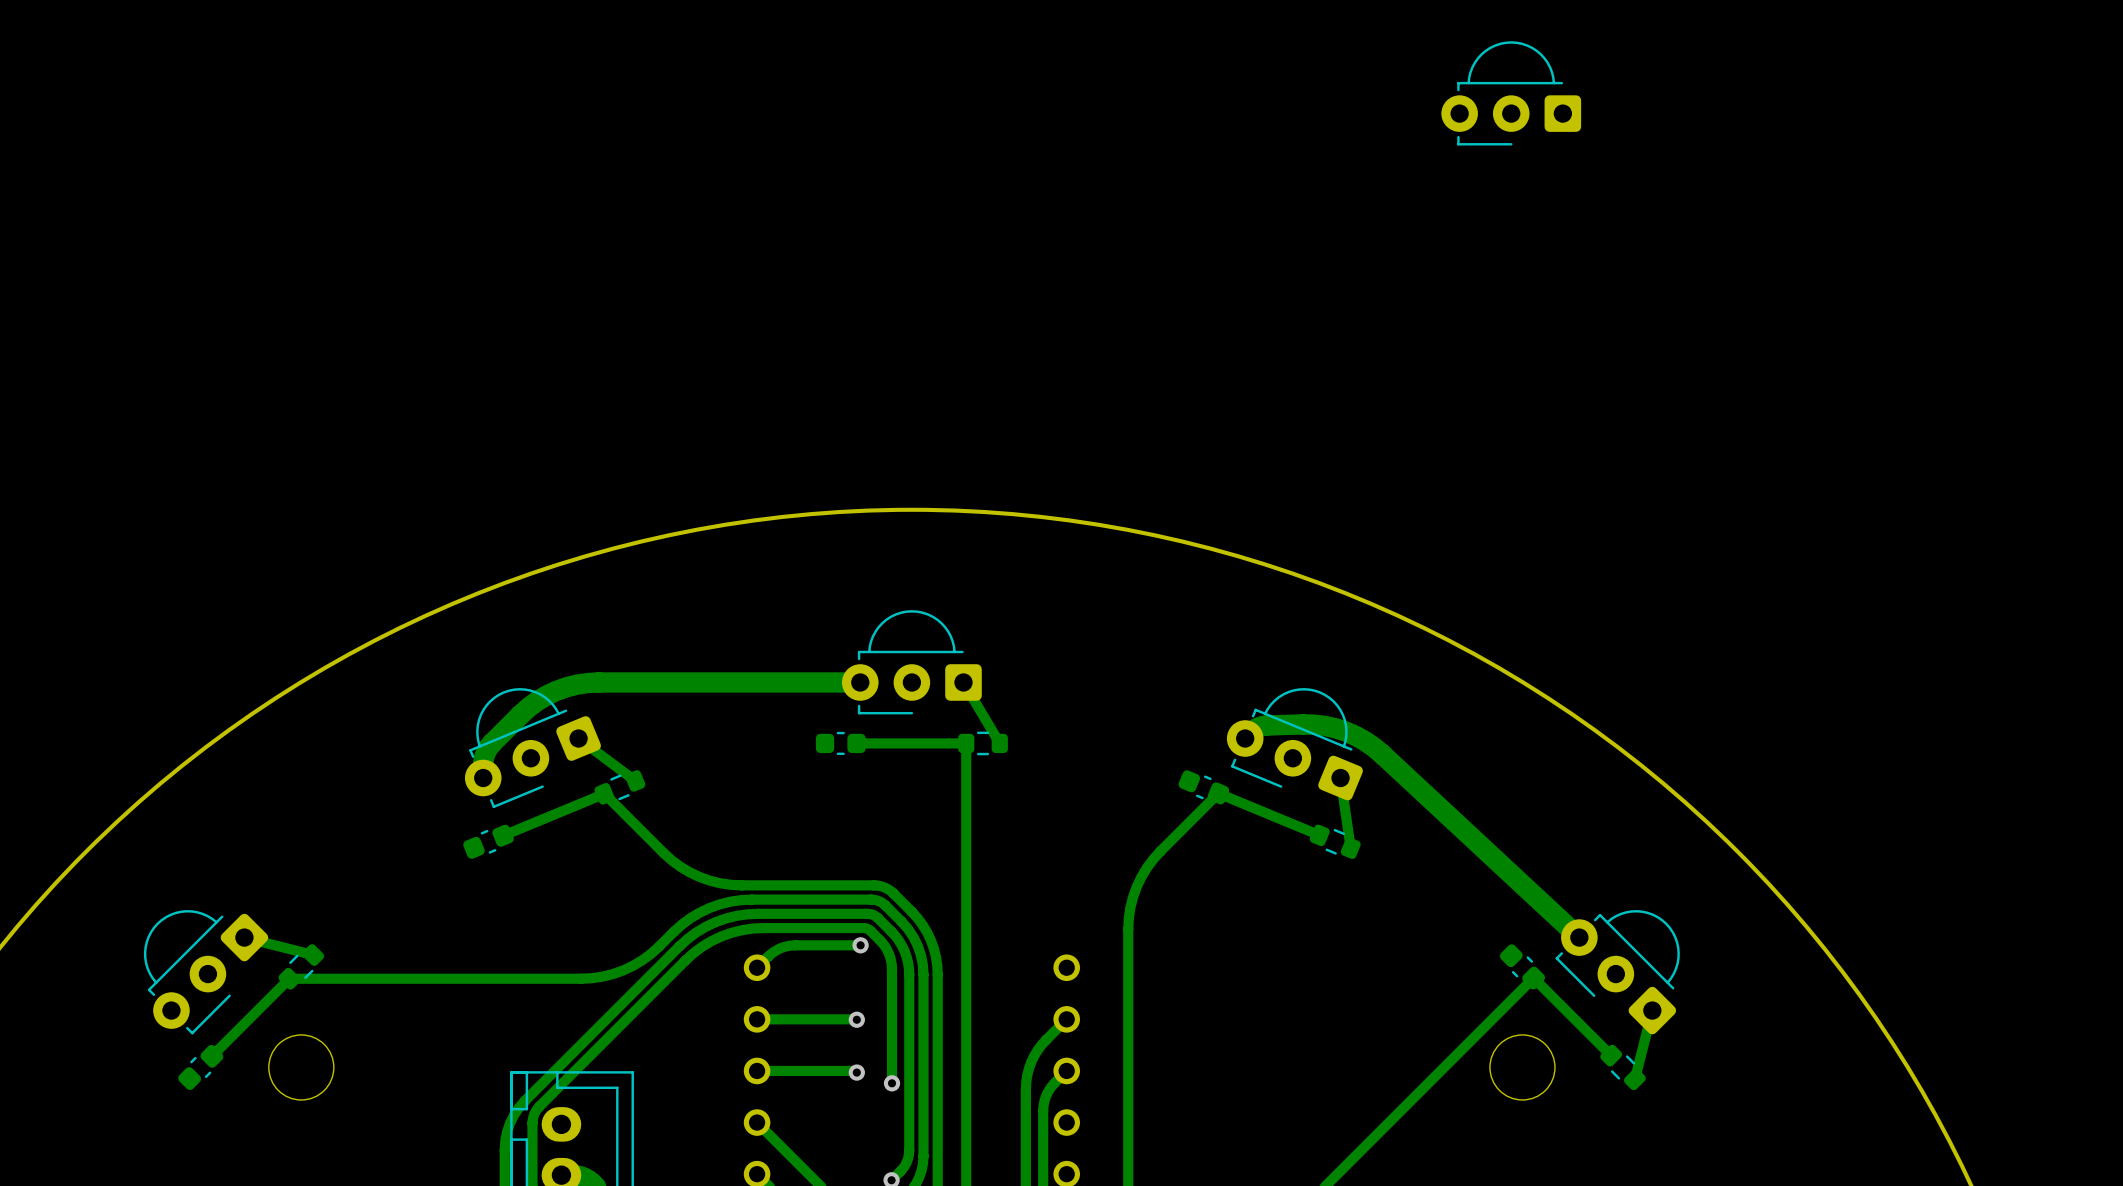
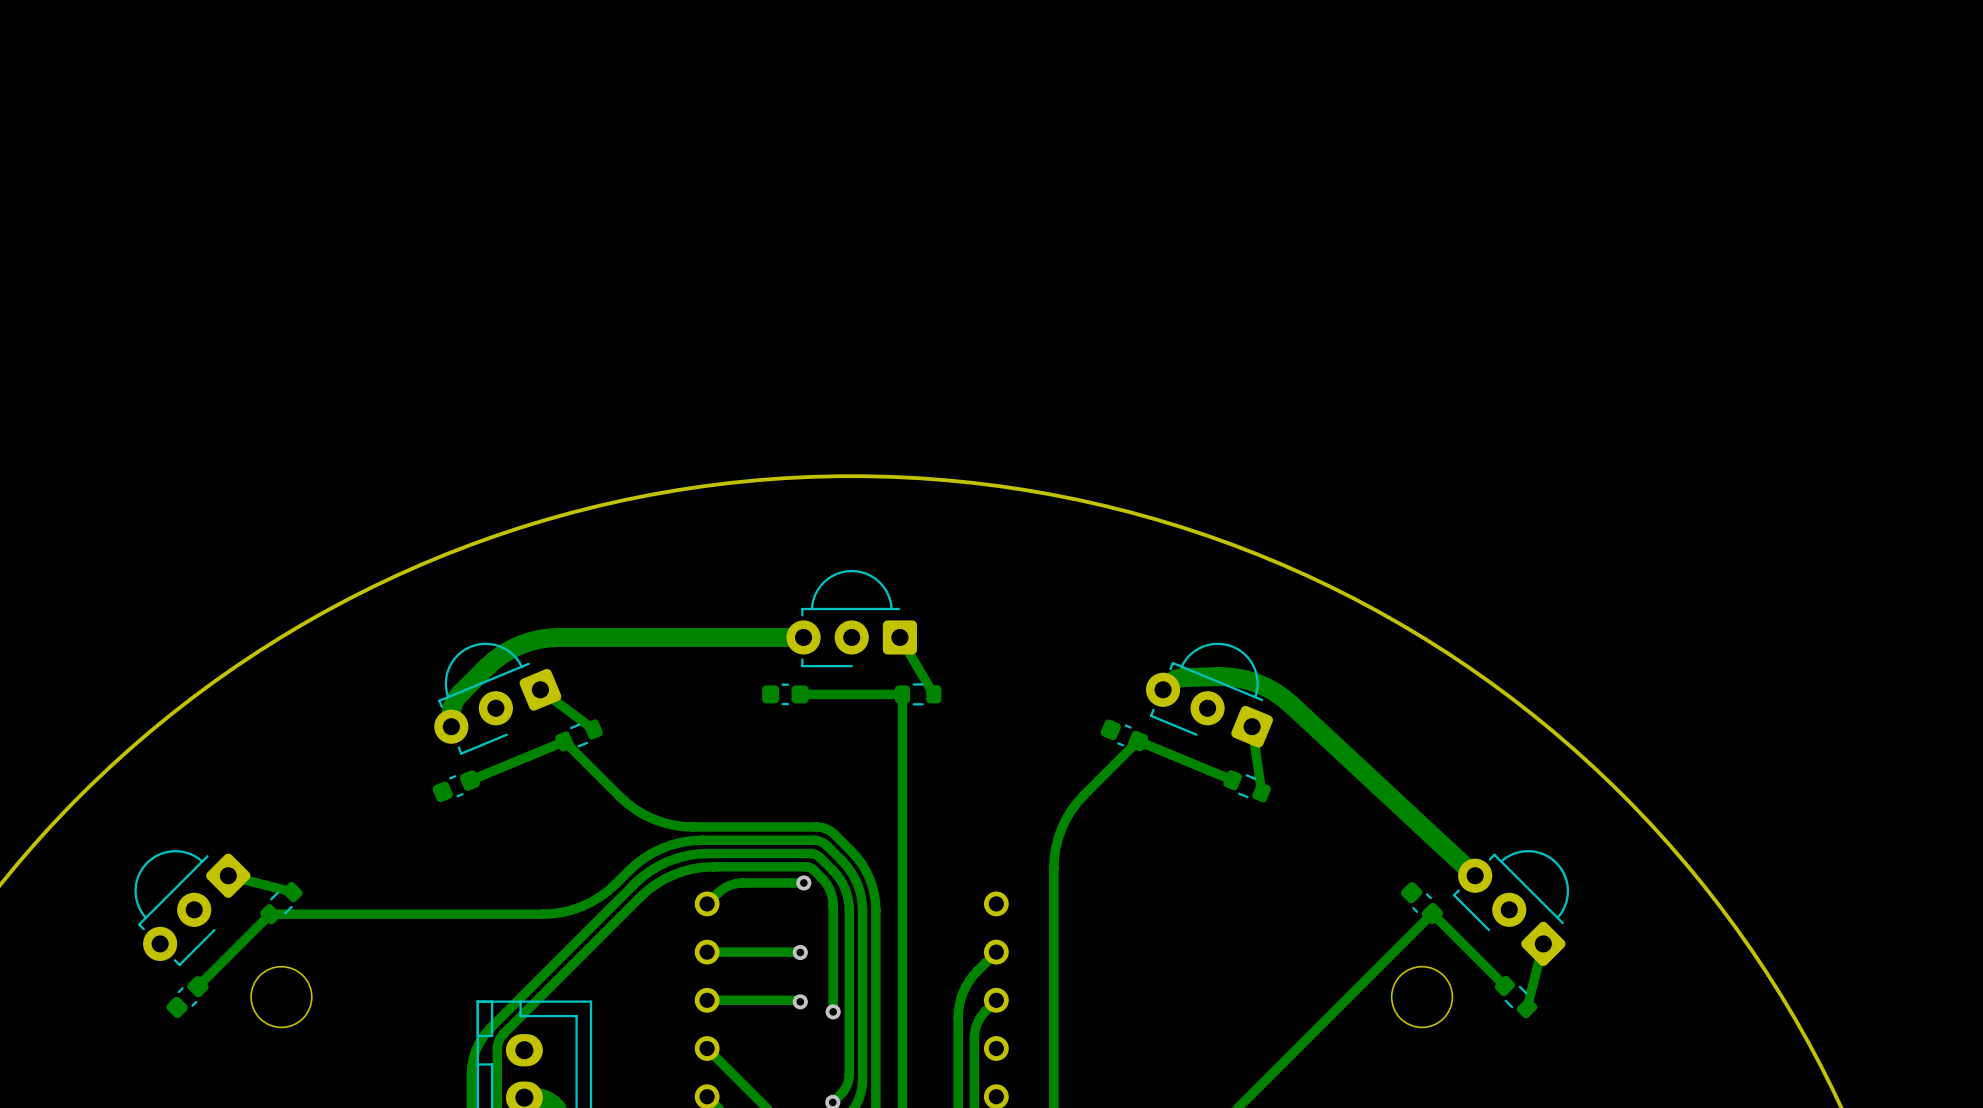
part: (1511, 93) -> none

